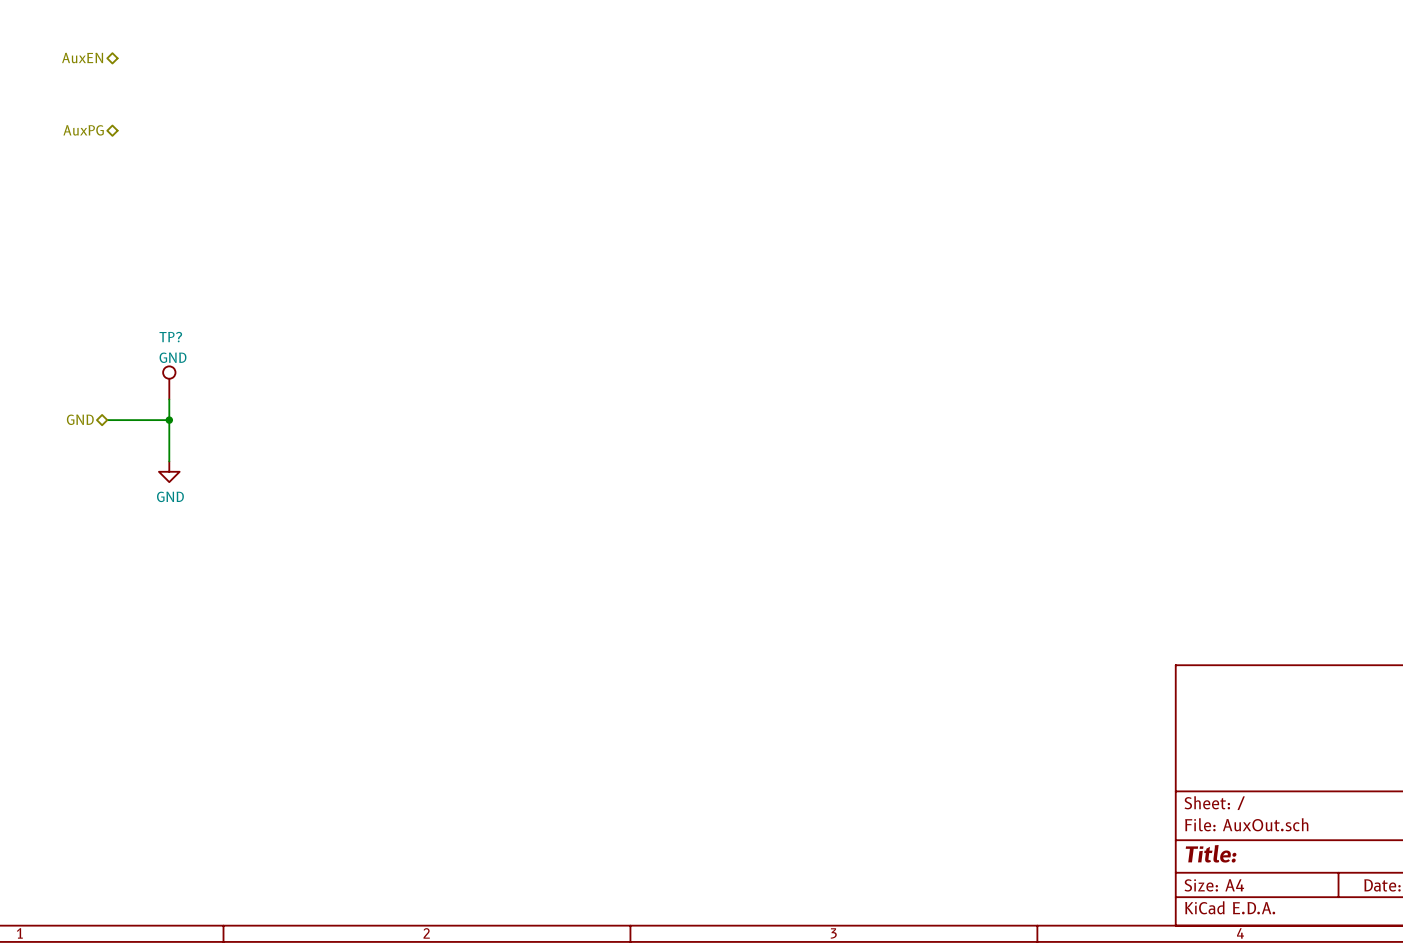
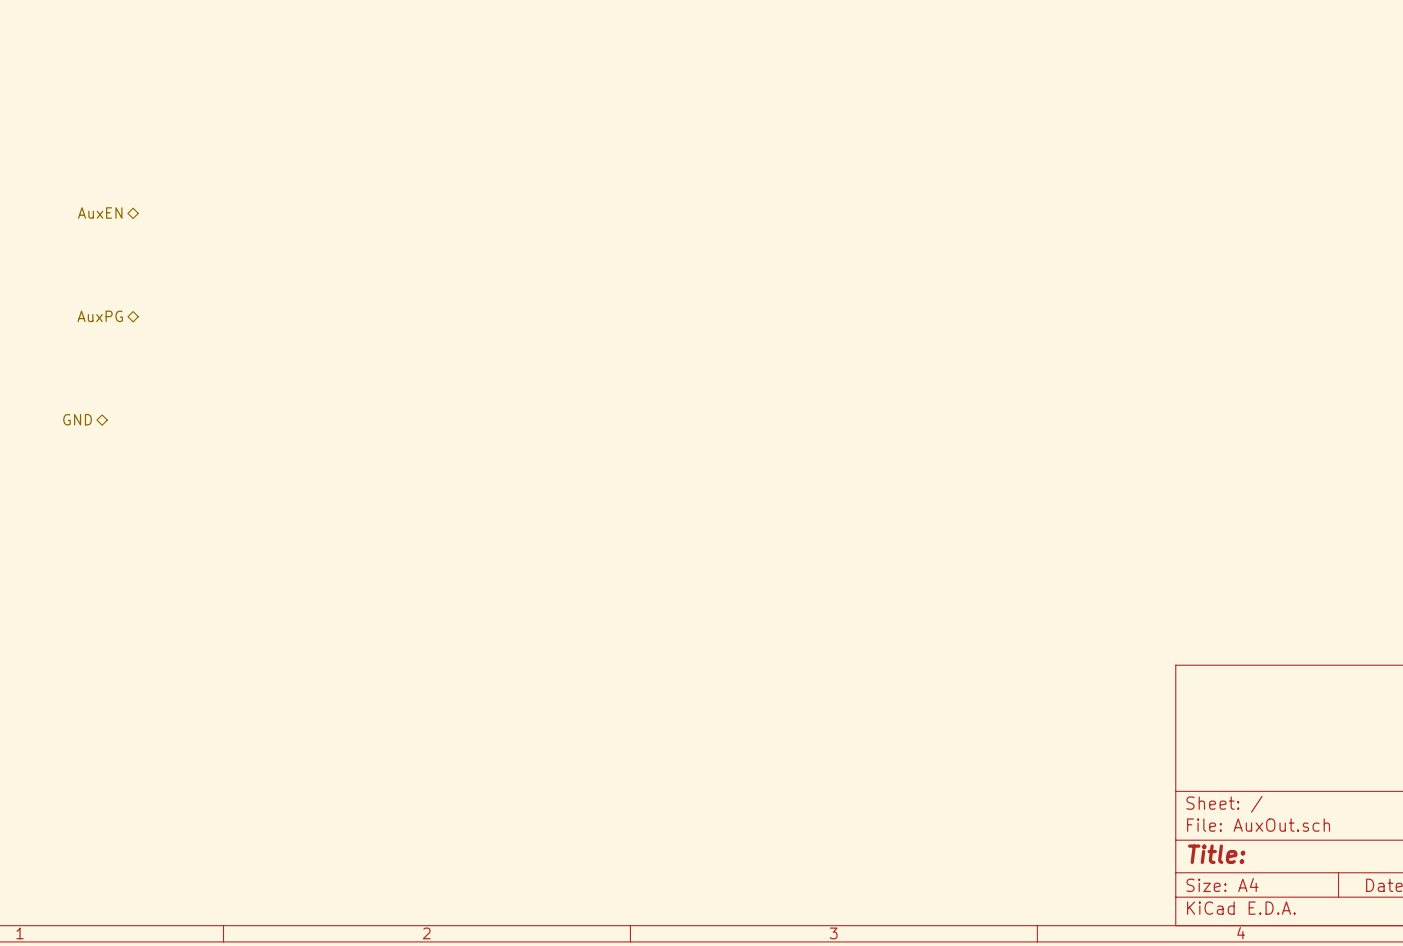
hierarchical label position: AuxEN (82, 58) -> AuxEN (100, 213)
hierarchical label position: AuxPG (83, 130) -> AuxPG (100, 316)
TP?: GND (169, 382) -> none
wire: (169, 399) (169, 461) -> none
wire: (107, 420) (169, 420) -> none
junction: (169, 420) -> none
power symbol: GND (169, 471) -> none

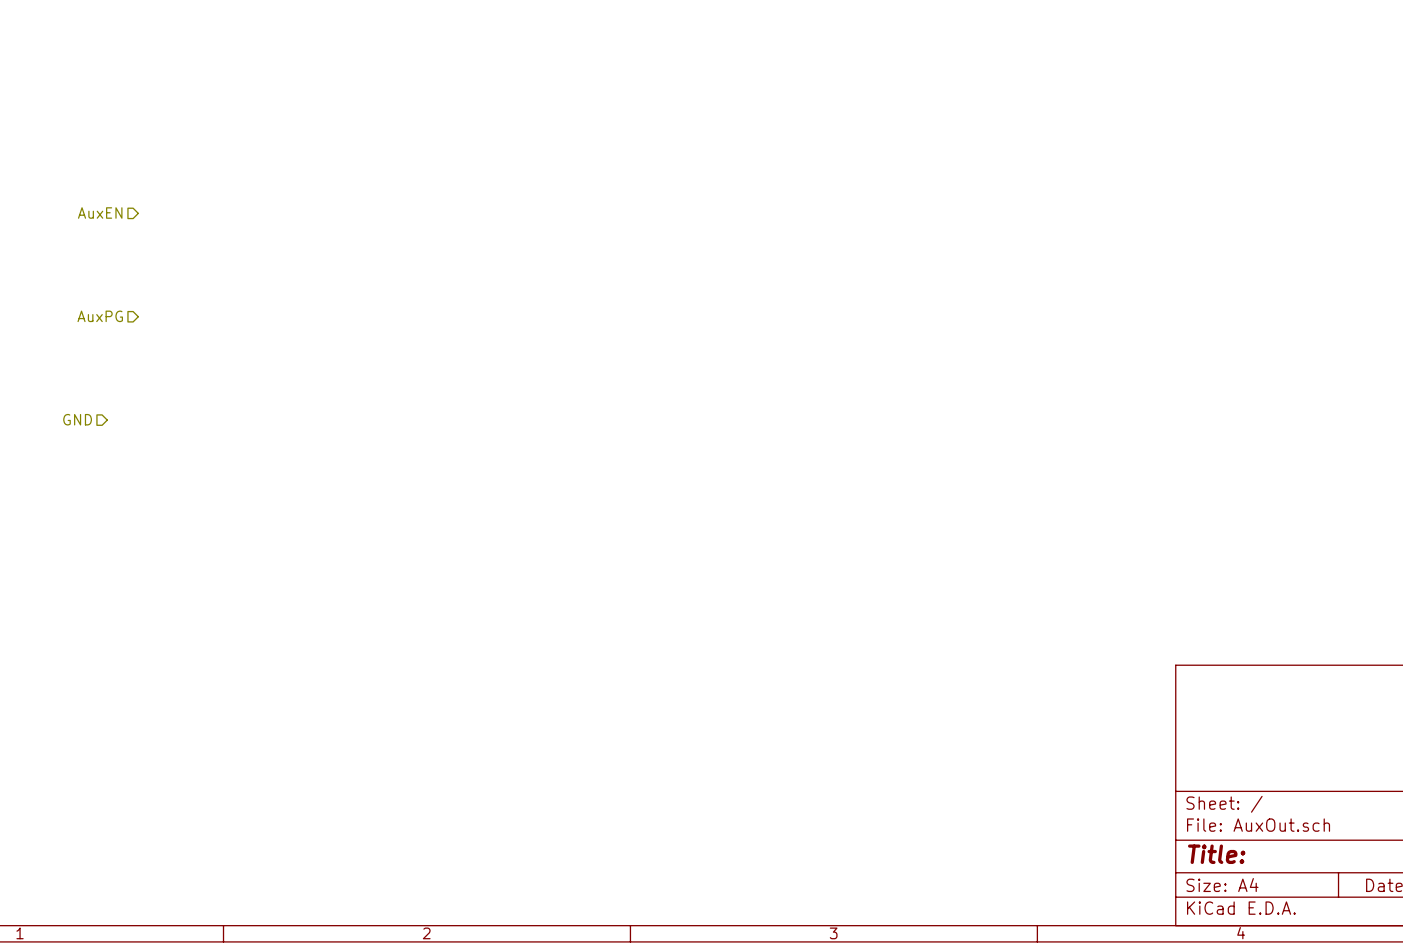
hierarchical label shape: bidirectional (100, 213) -> input (100, 213)
hierarchical label shape: bidirectional (100, 316) -> input (100, 316)
hierarchical label shape: bidirectional (77, 419) -> input (77, 419)

